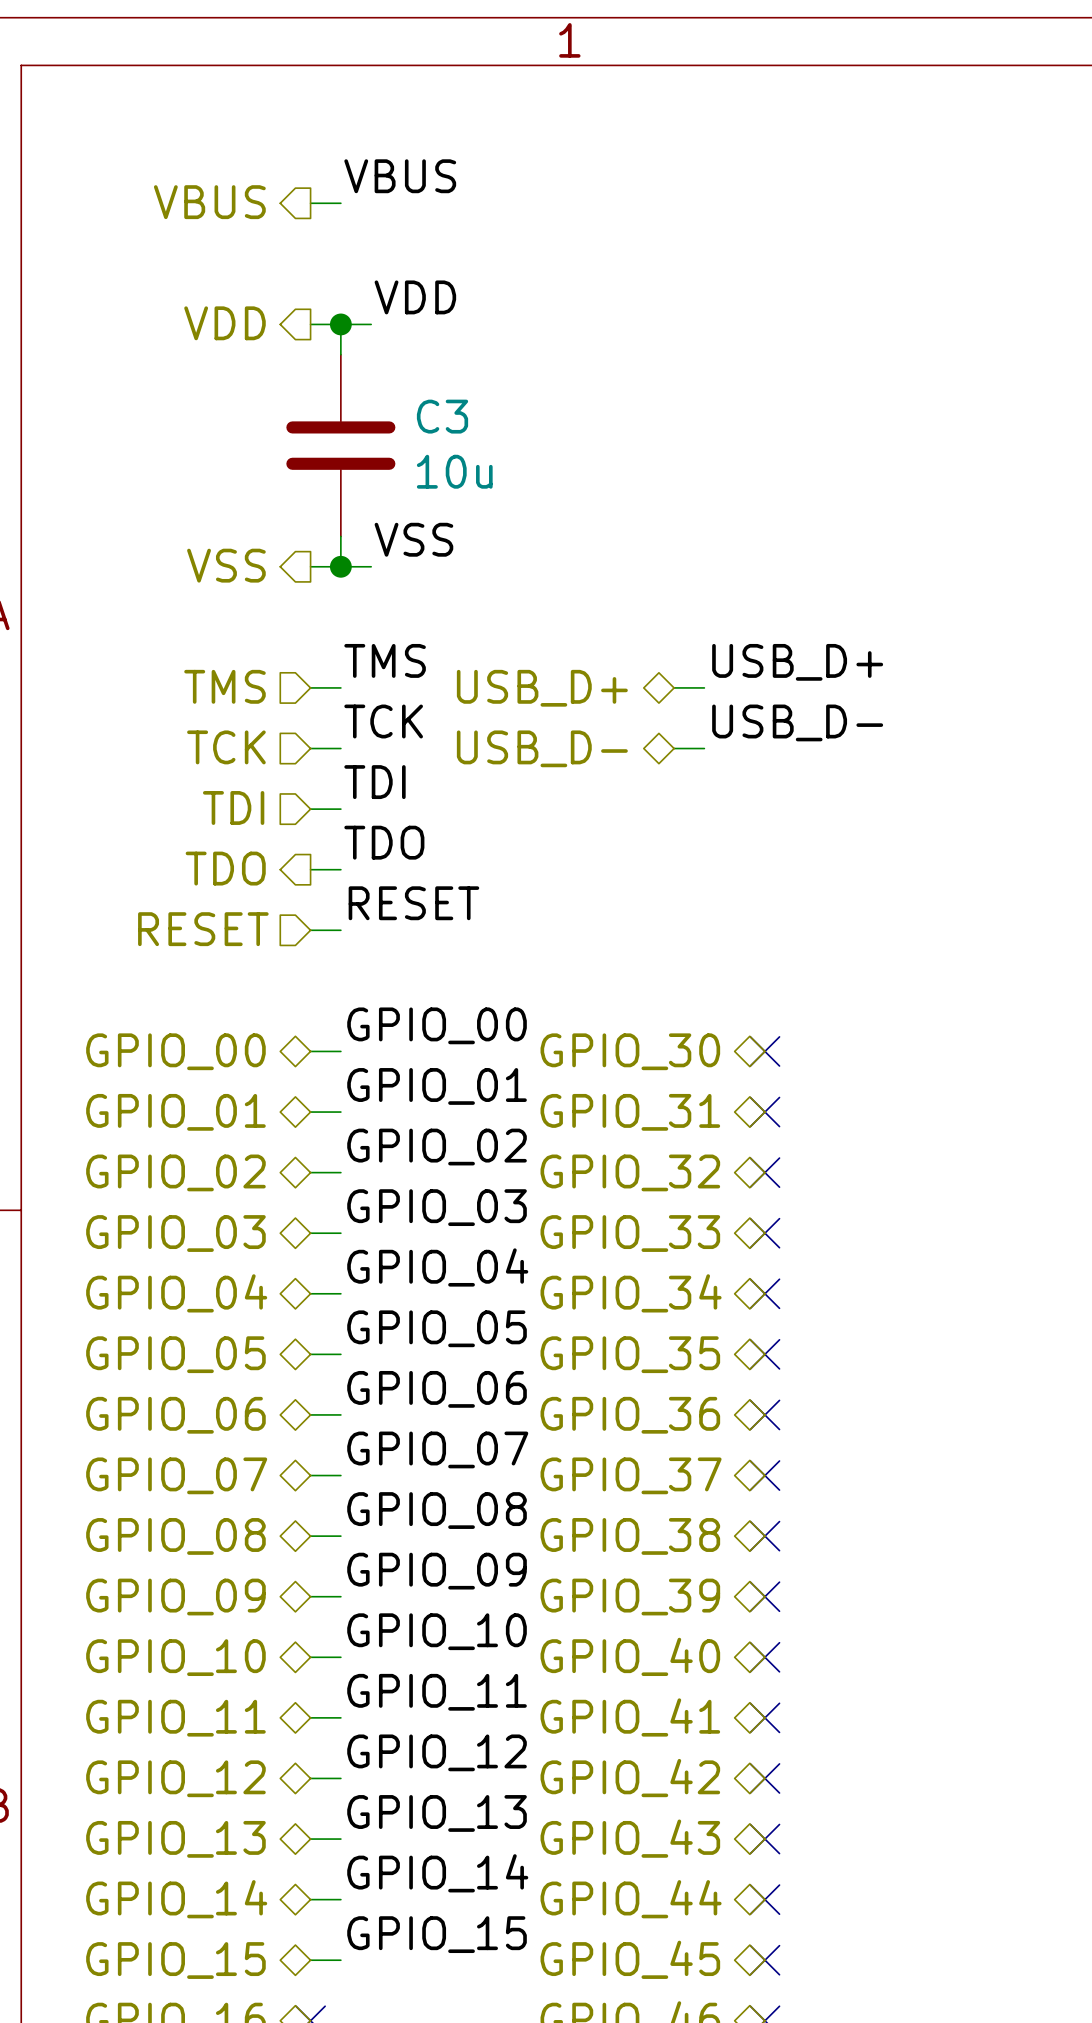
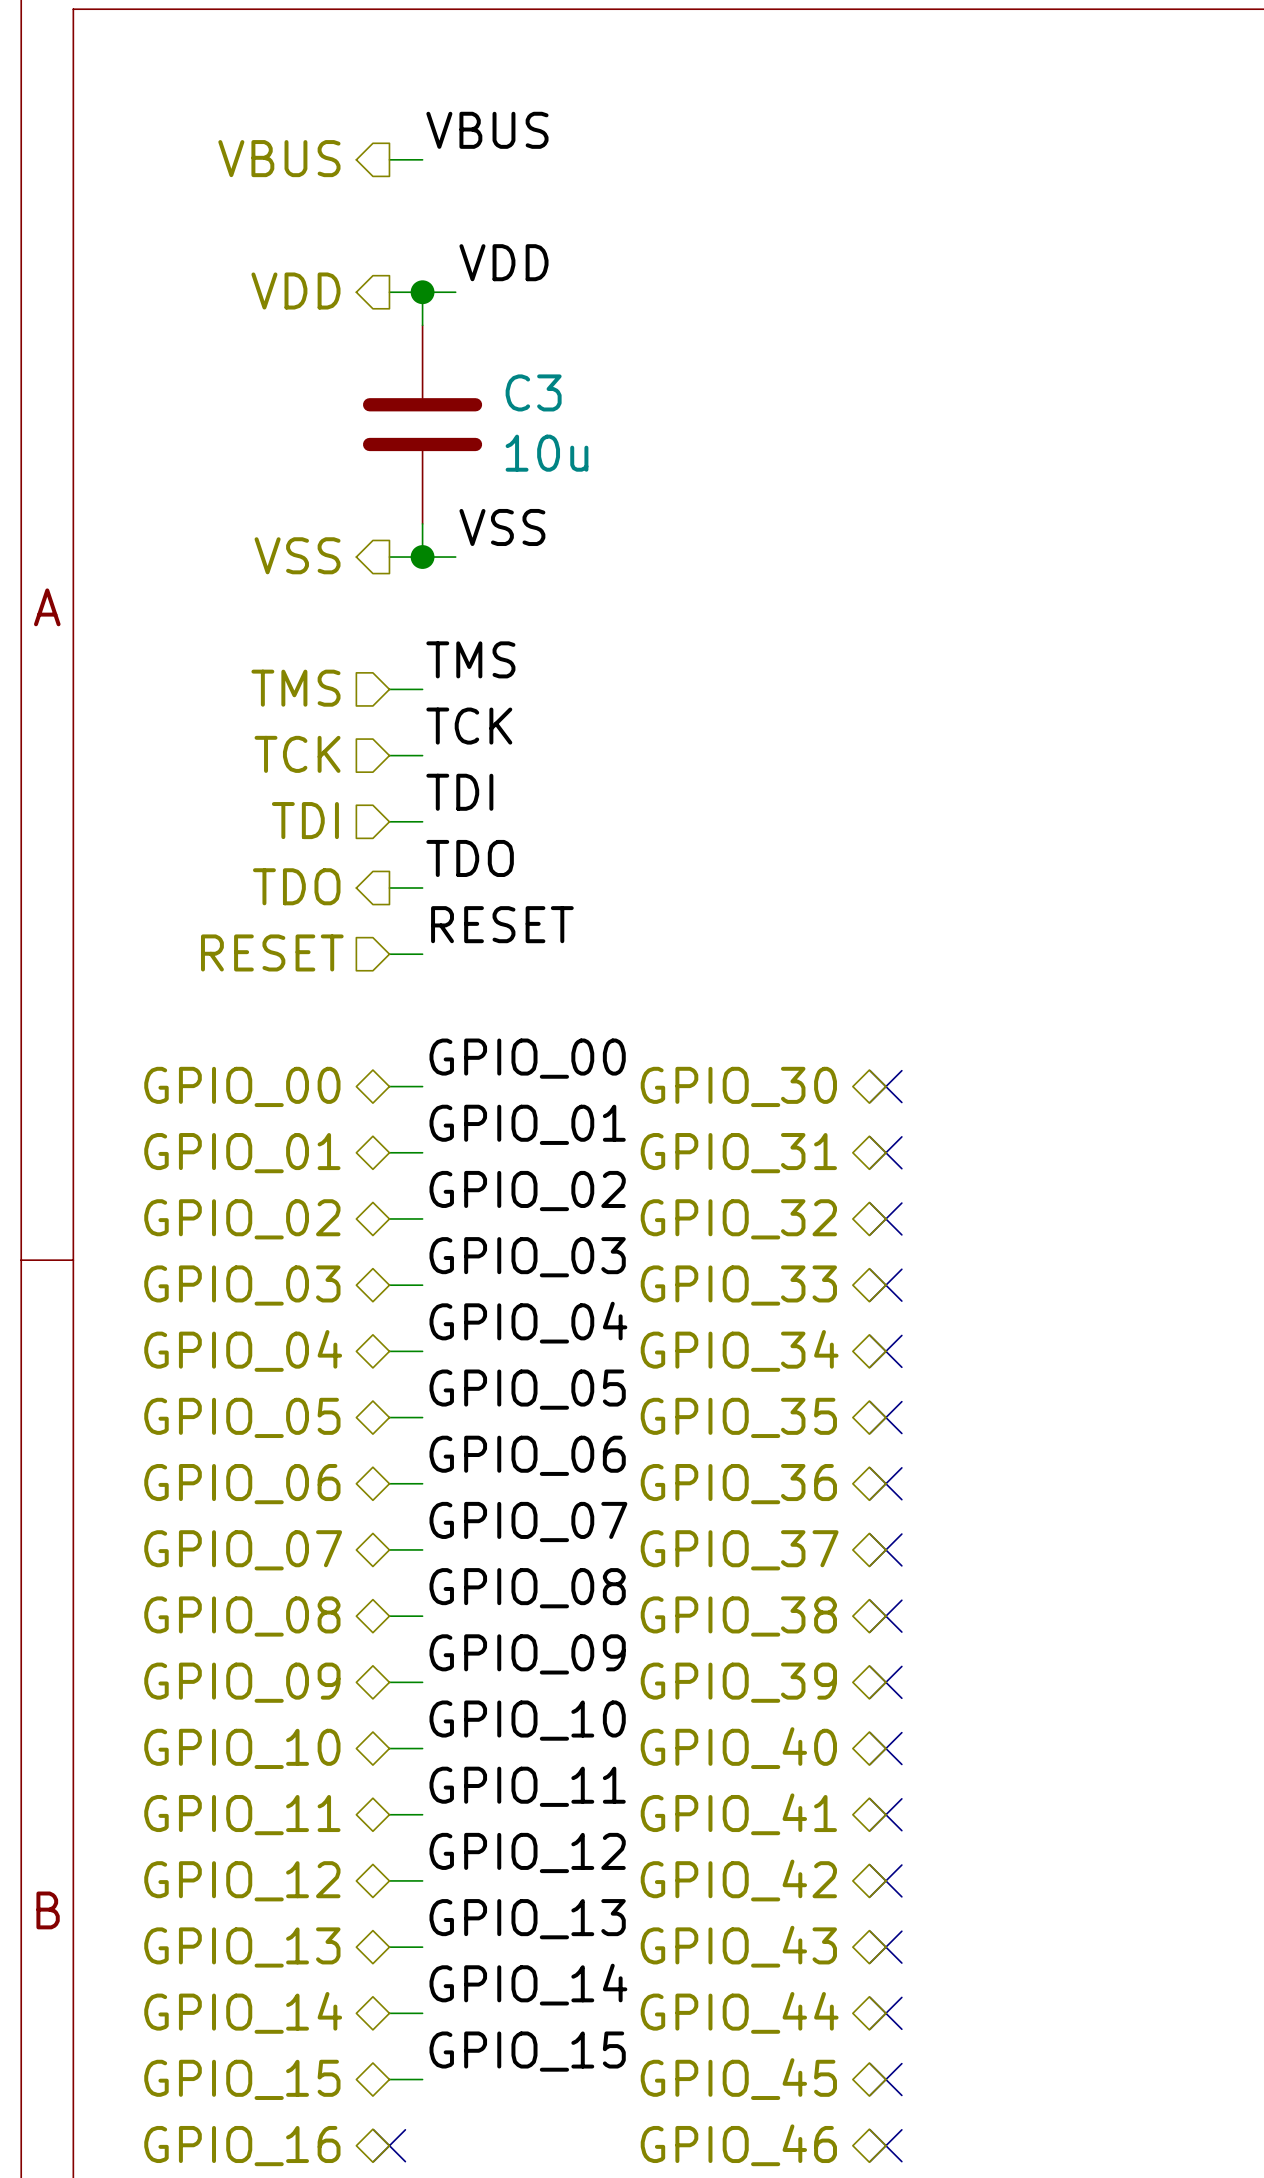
label: USB_D+ (797, 662) -> none
wire: (674, 687) (704, 687) -> none
hierarchical label: USB_D+ (542, 688) -> none
label: USB_D- (797, 722) -> none
hierarchical label: USB_D- (542, 748) -> none
wire: (674, 748) (704, 748) -> none

